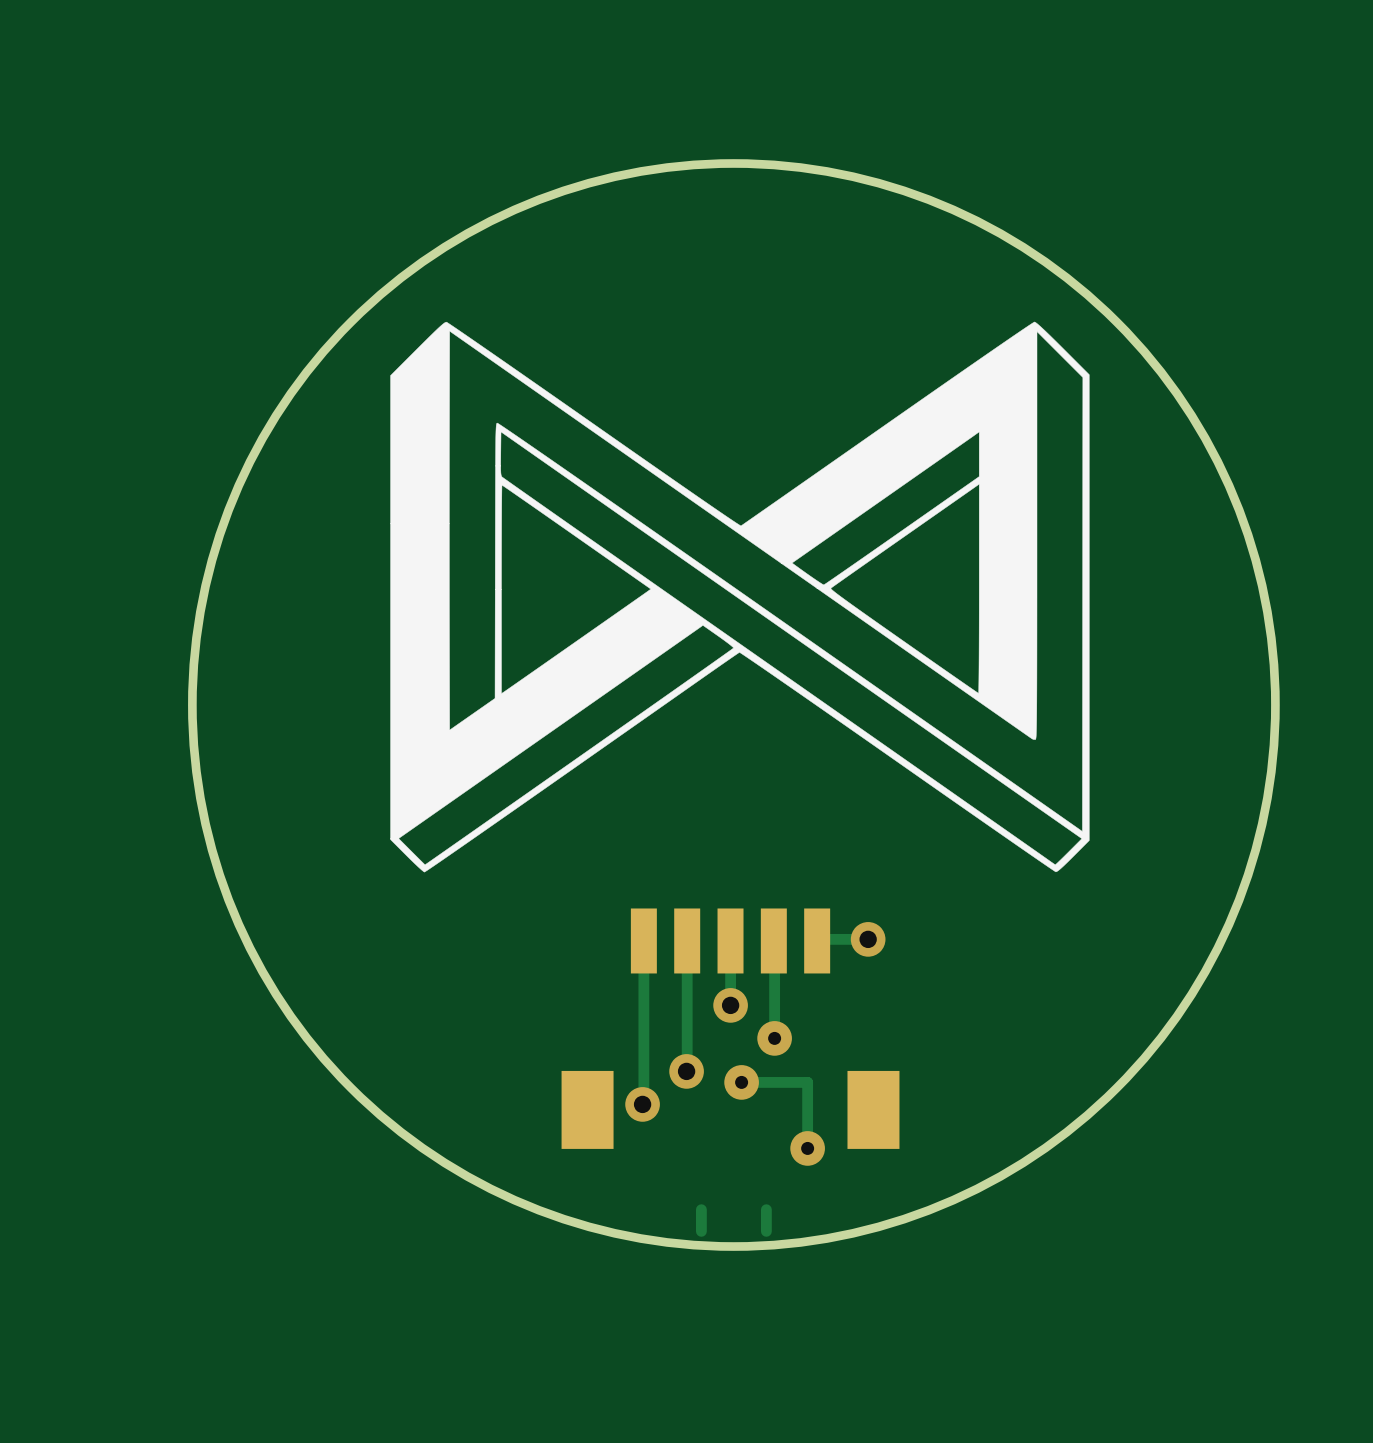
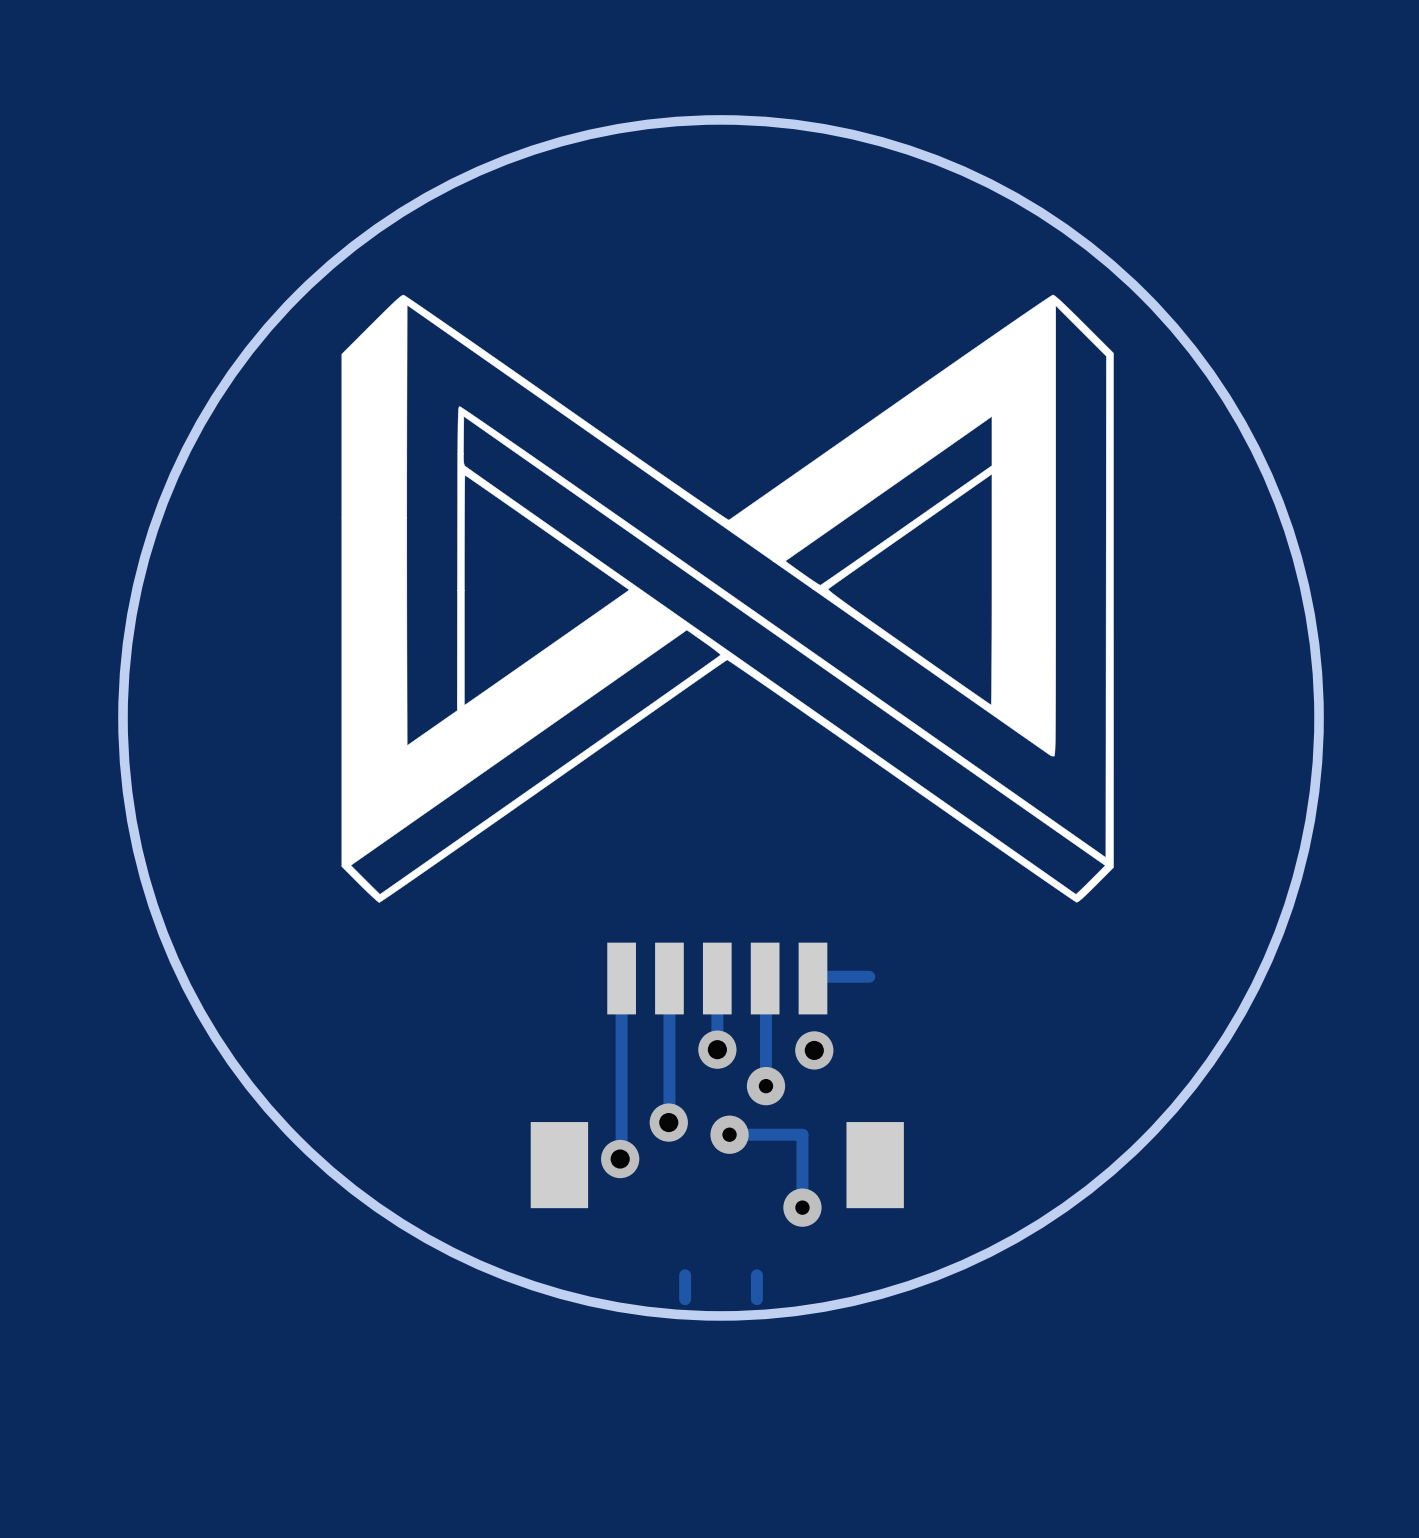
via position: (868, 939) -> (814, 1050)

